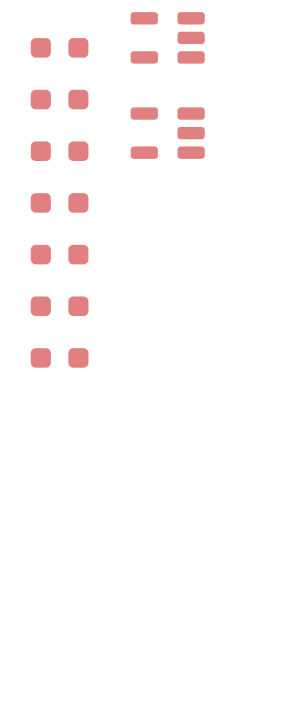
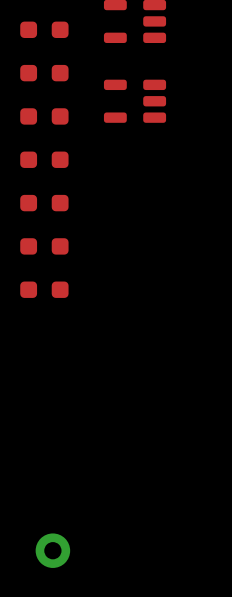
part: none -> (52, 550)

